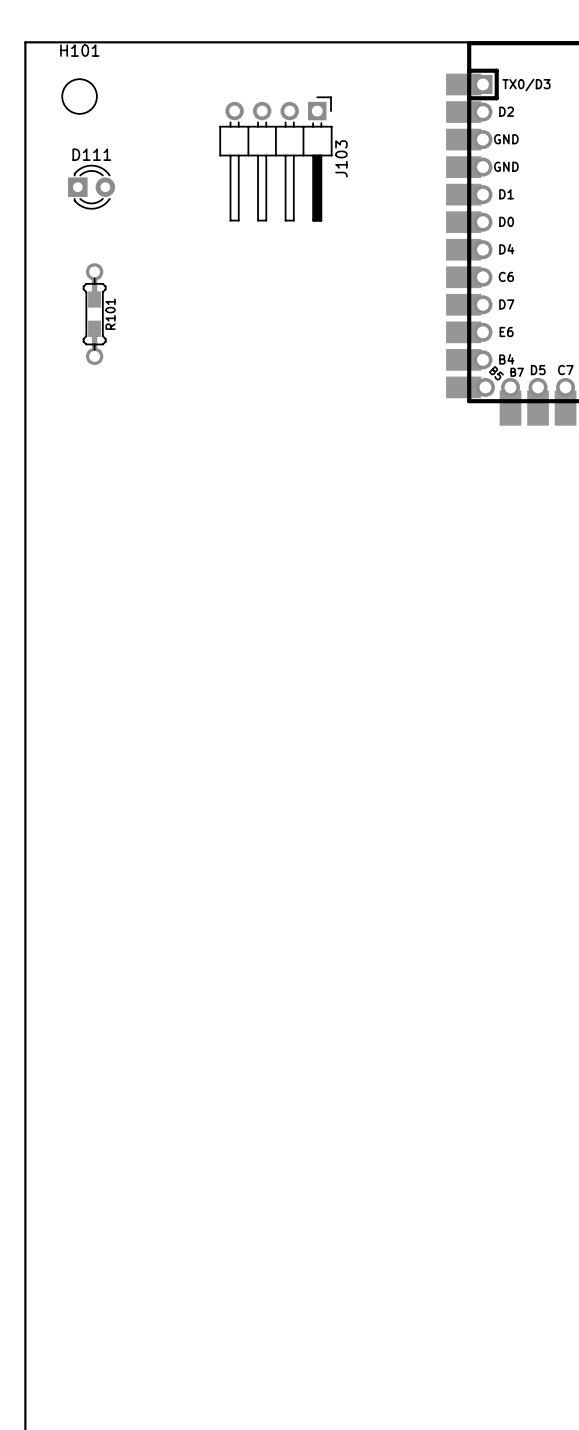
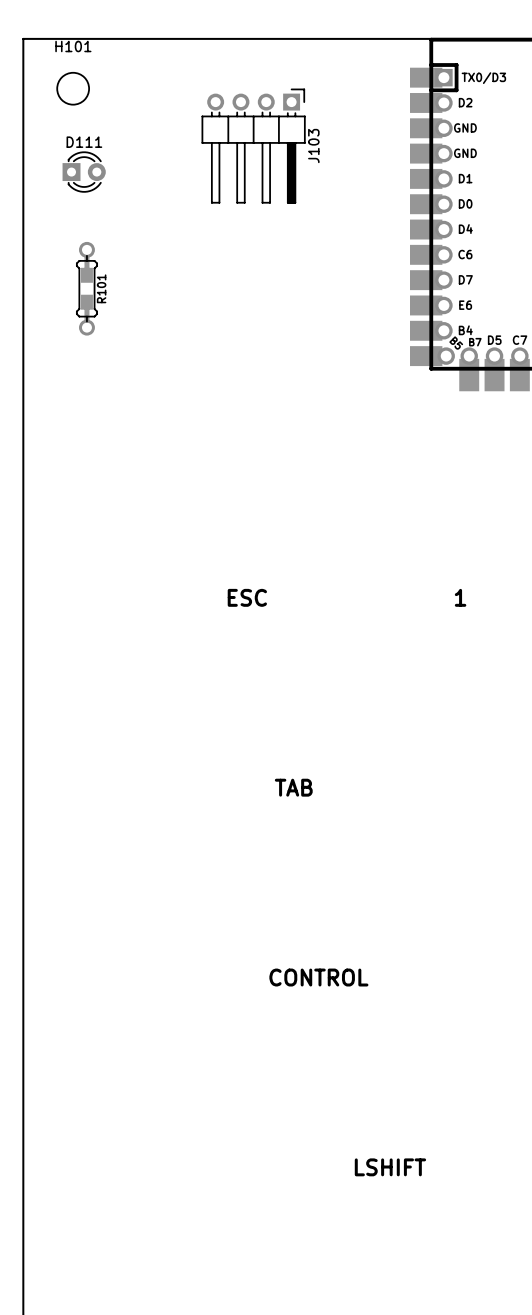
text: none -> ESC (247, 597)
text: none -> 1 (460, 597)
text: none -> TAB (293, 787)
text: none -> CONTROL (318, 977)
text: none -> LSHIFT (390, 1167)

